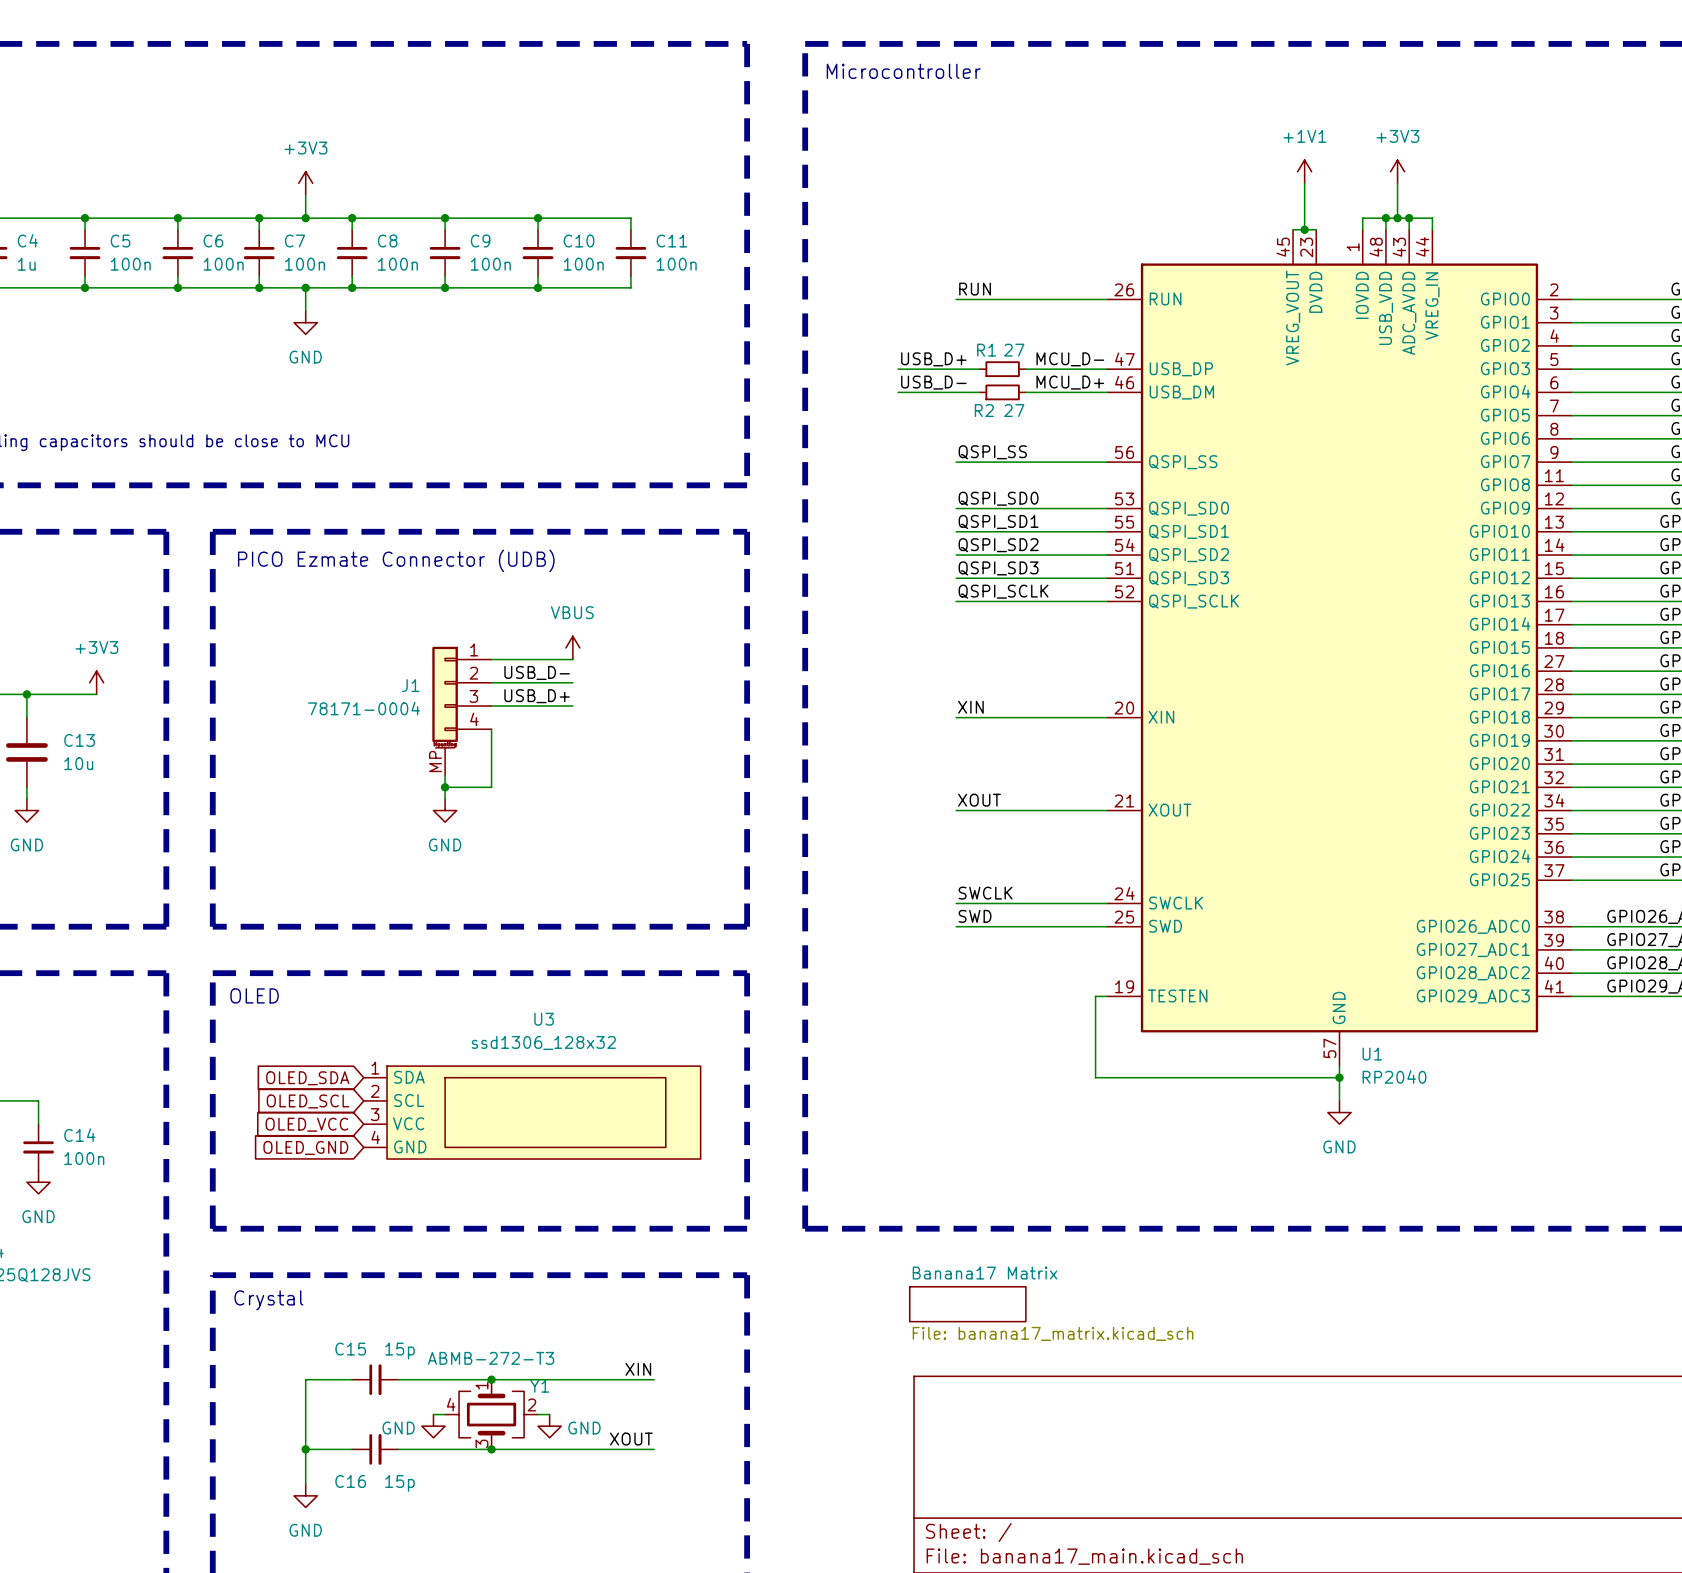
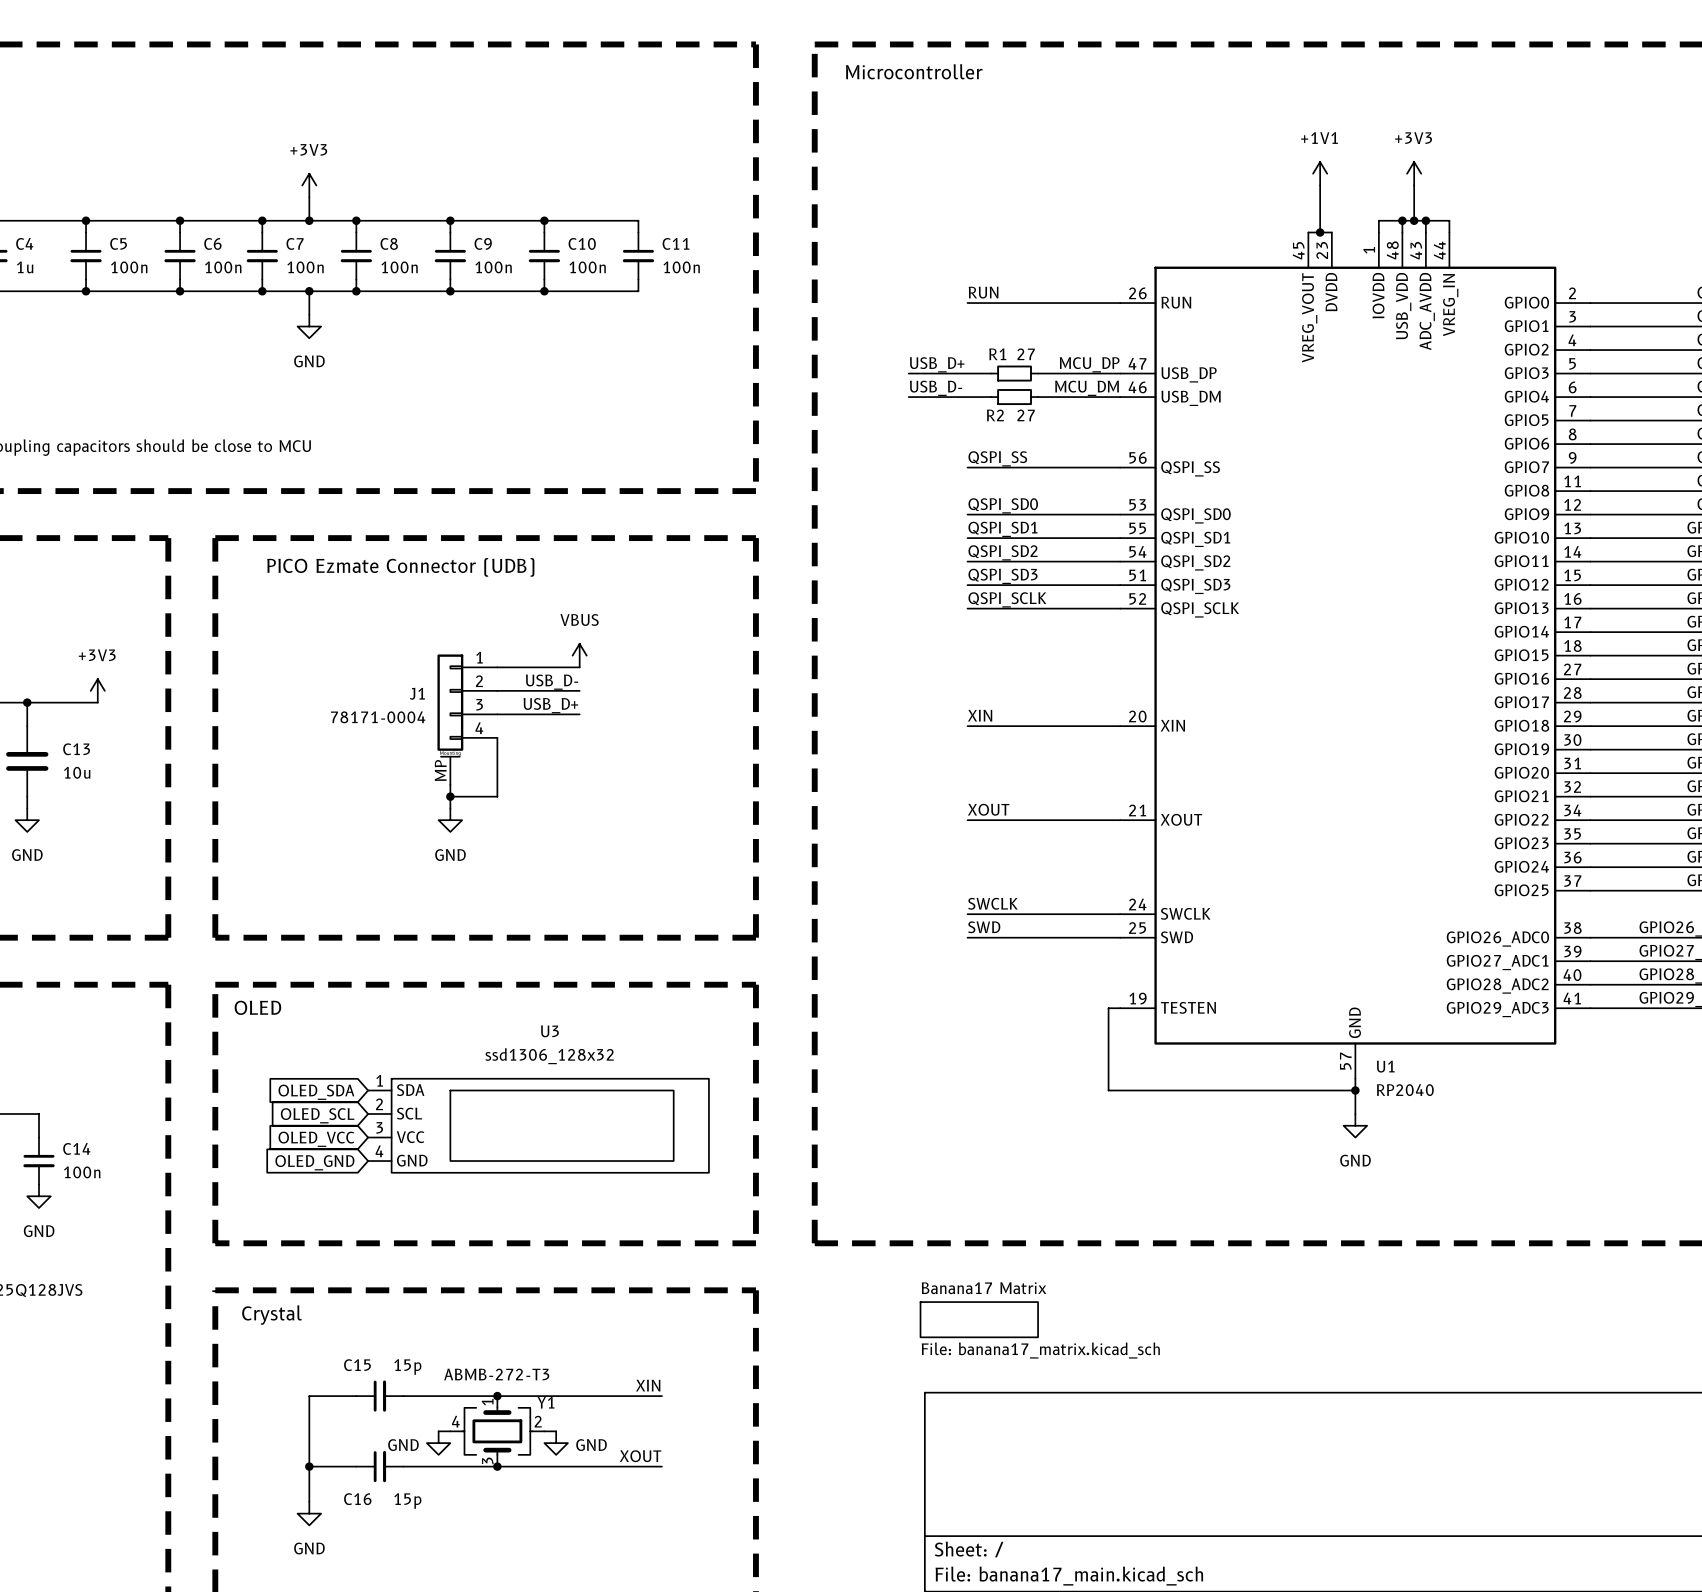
label: MCU_D- (1070, 359) -> MCU_DP (1089, 364)
label: MCU_D+ (1070, 382) -> MCU_DM (1087, 388)

